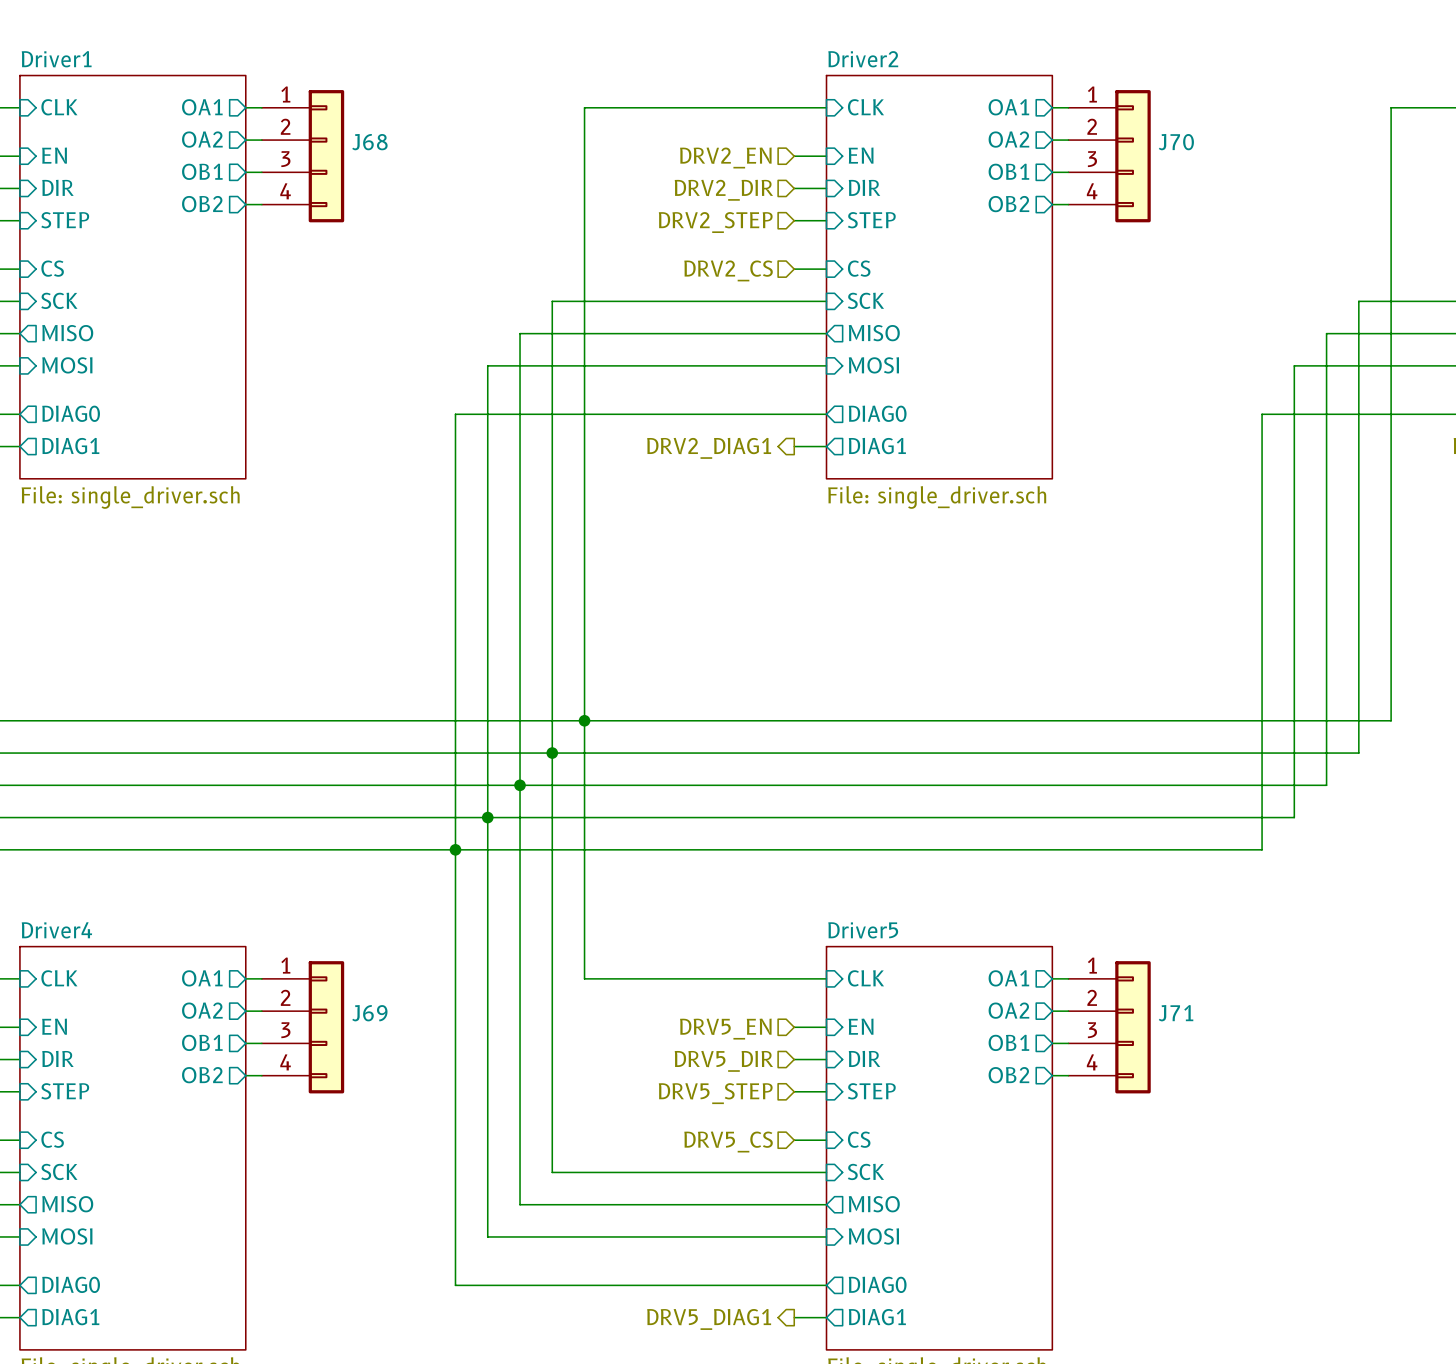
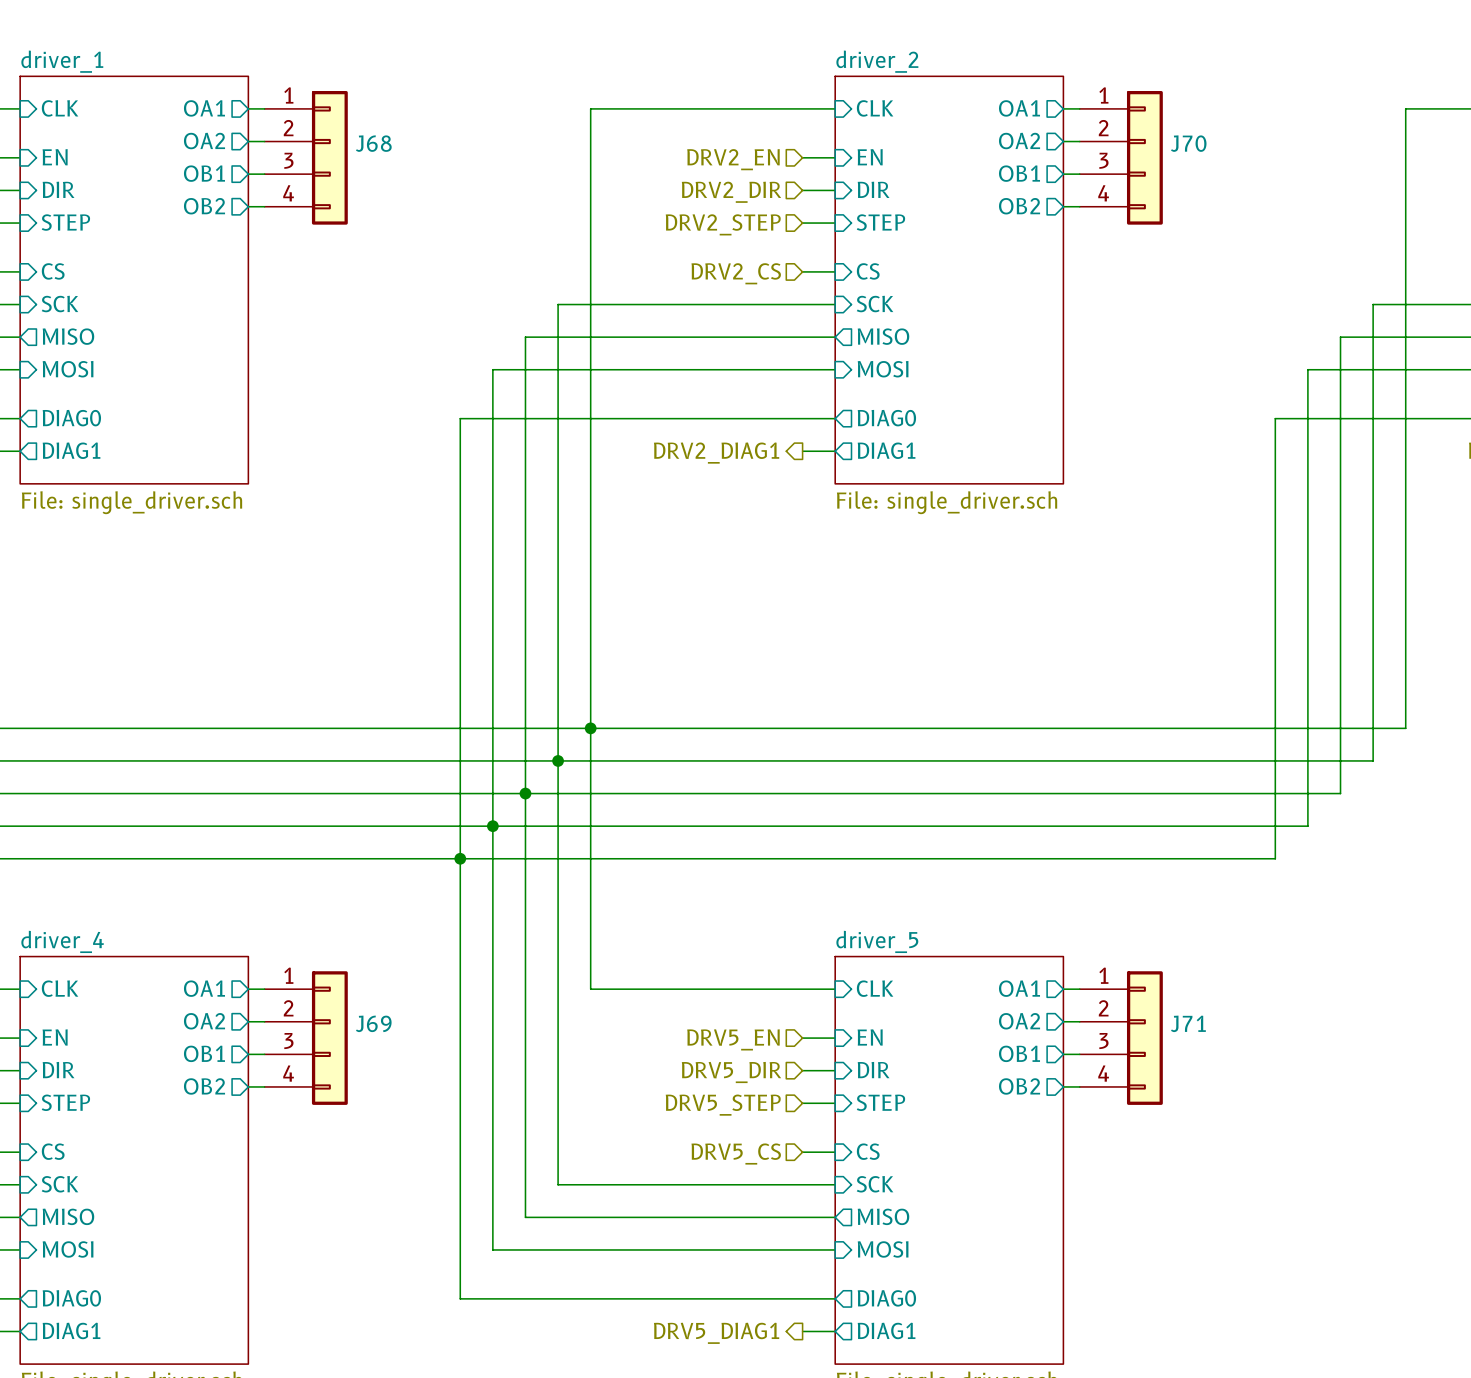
sheet Driver1 name: Driver1 (56, 59) -> driver_1 (62, 61)
sheet Driver2 name: Driver2 (863, 59) -> driver_2 (877, 61)
sheet Driver4 name: Driver4 (56, 930) -> driver_4 (62, 941)
sheet Driver5 name: Driver5 (863, 930) -> driver_5 (877, 941)

